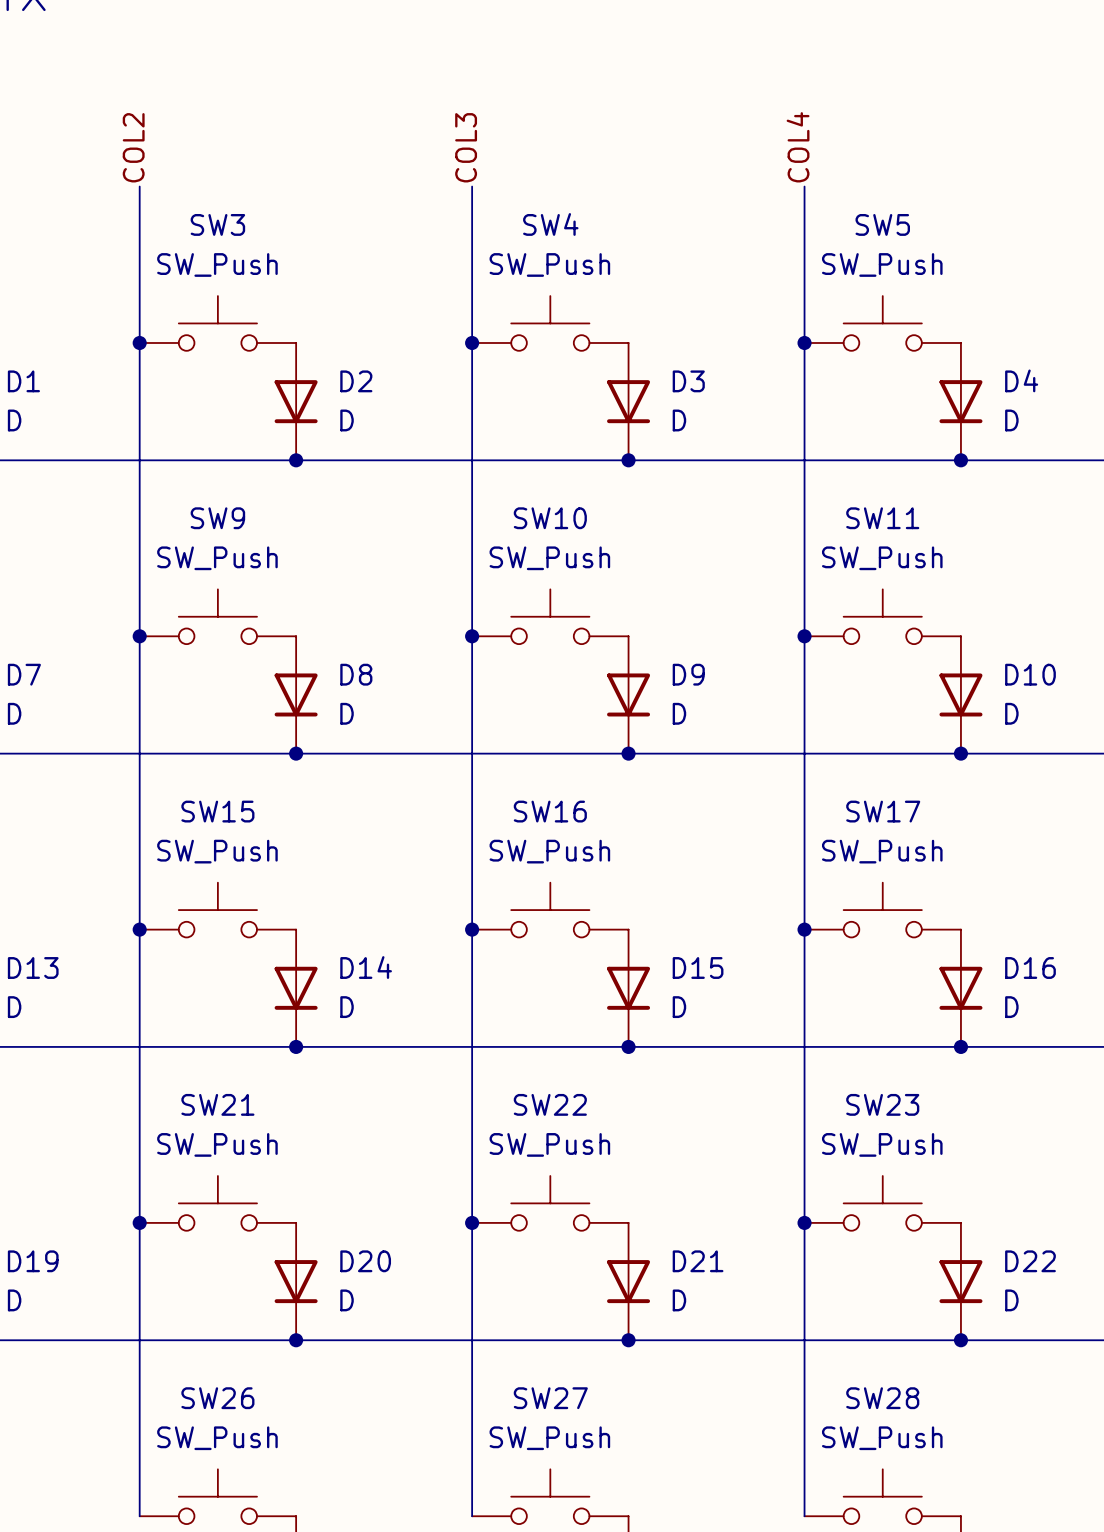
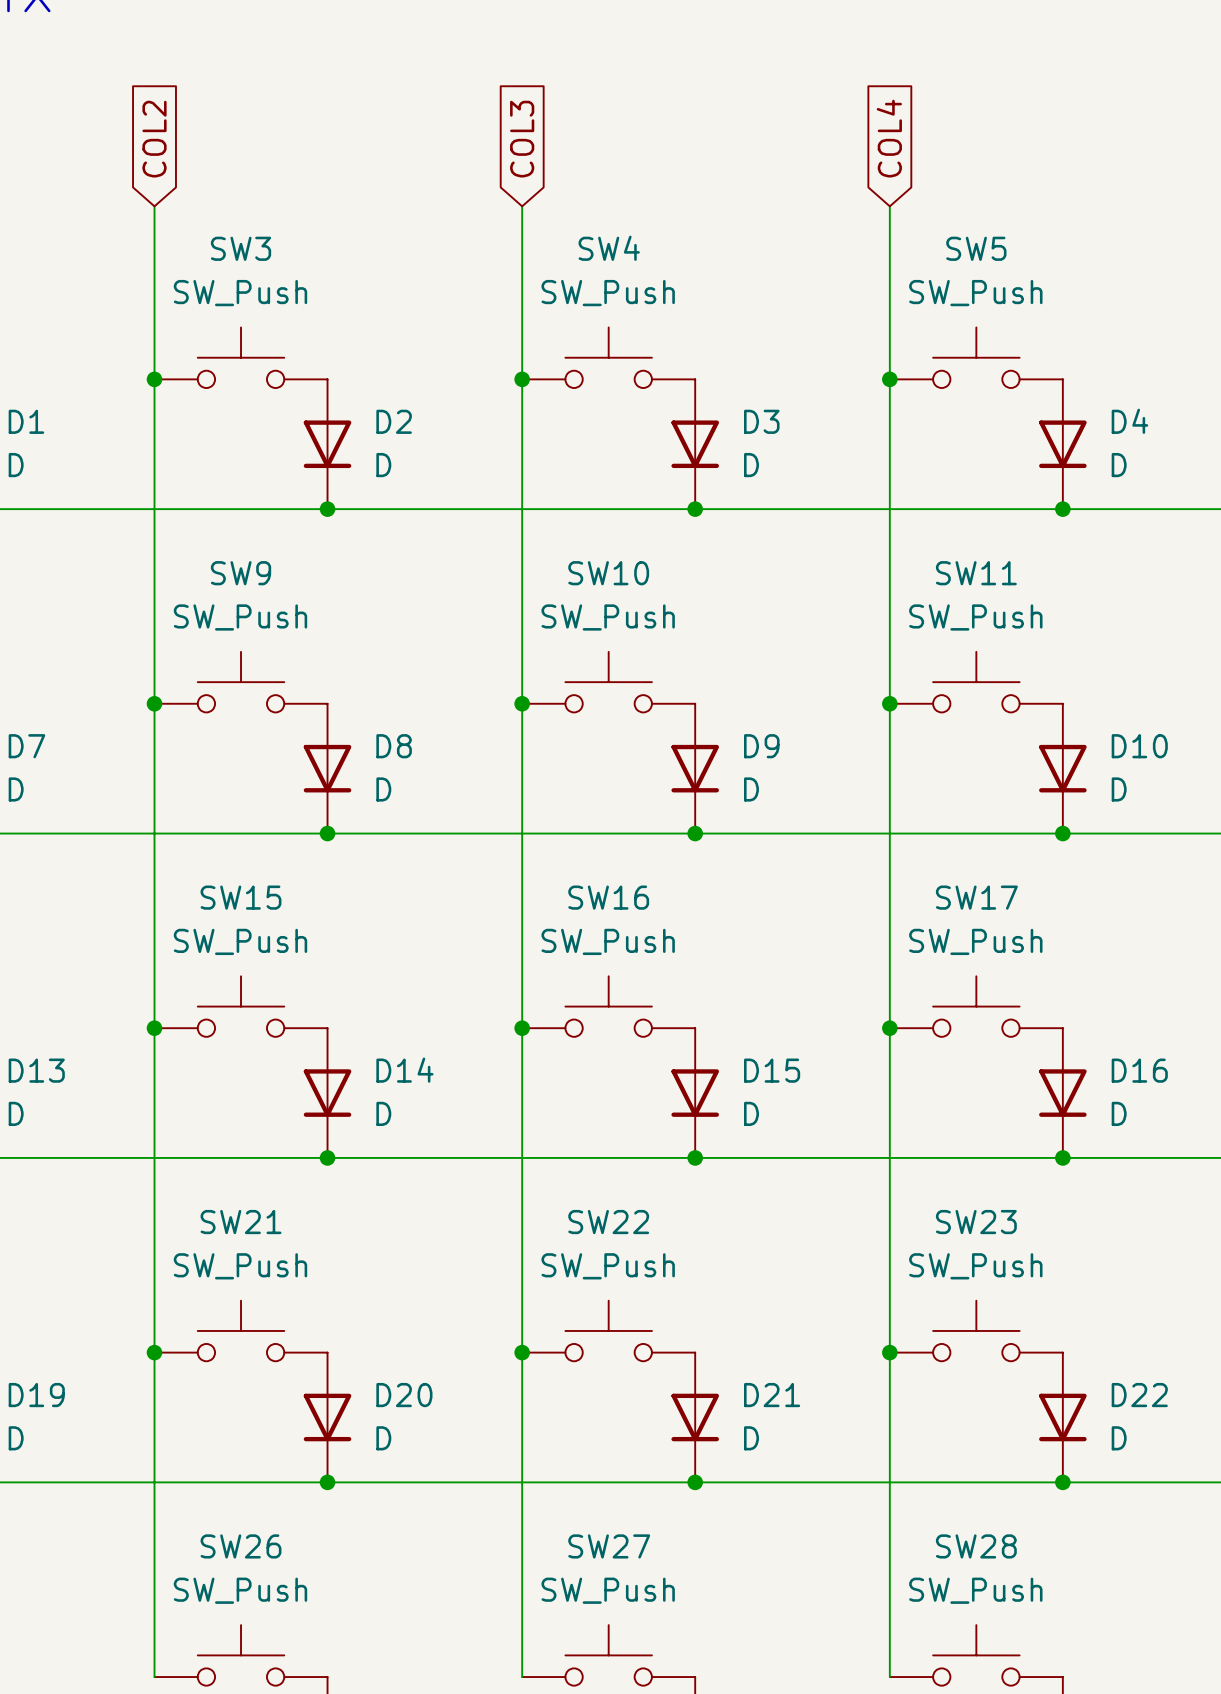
global label: none -> COL2 (154, 139)
global label: none -> COL3 (522, 139)
global label: none -> COL4 (889, 138)
label: COL2 (133, 147) -> none
label: COL3 (466, 147) -> none
label: COL4 (798, 147) -> none

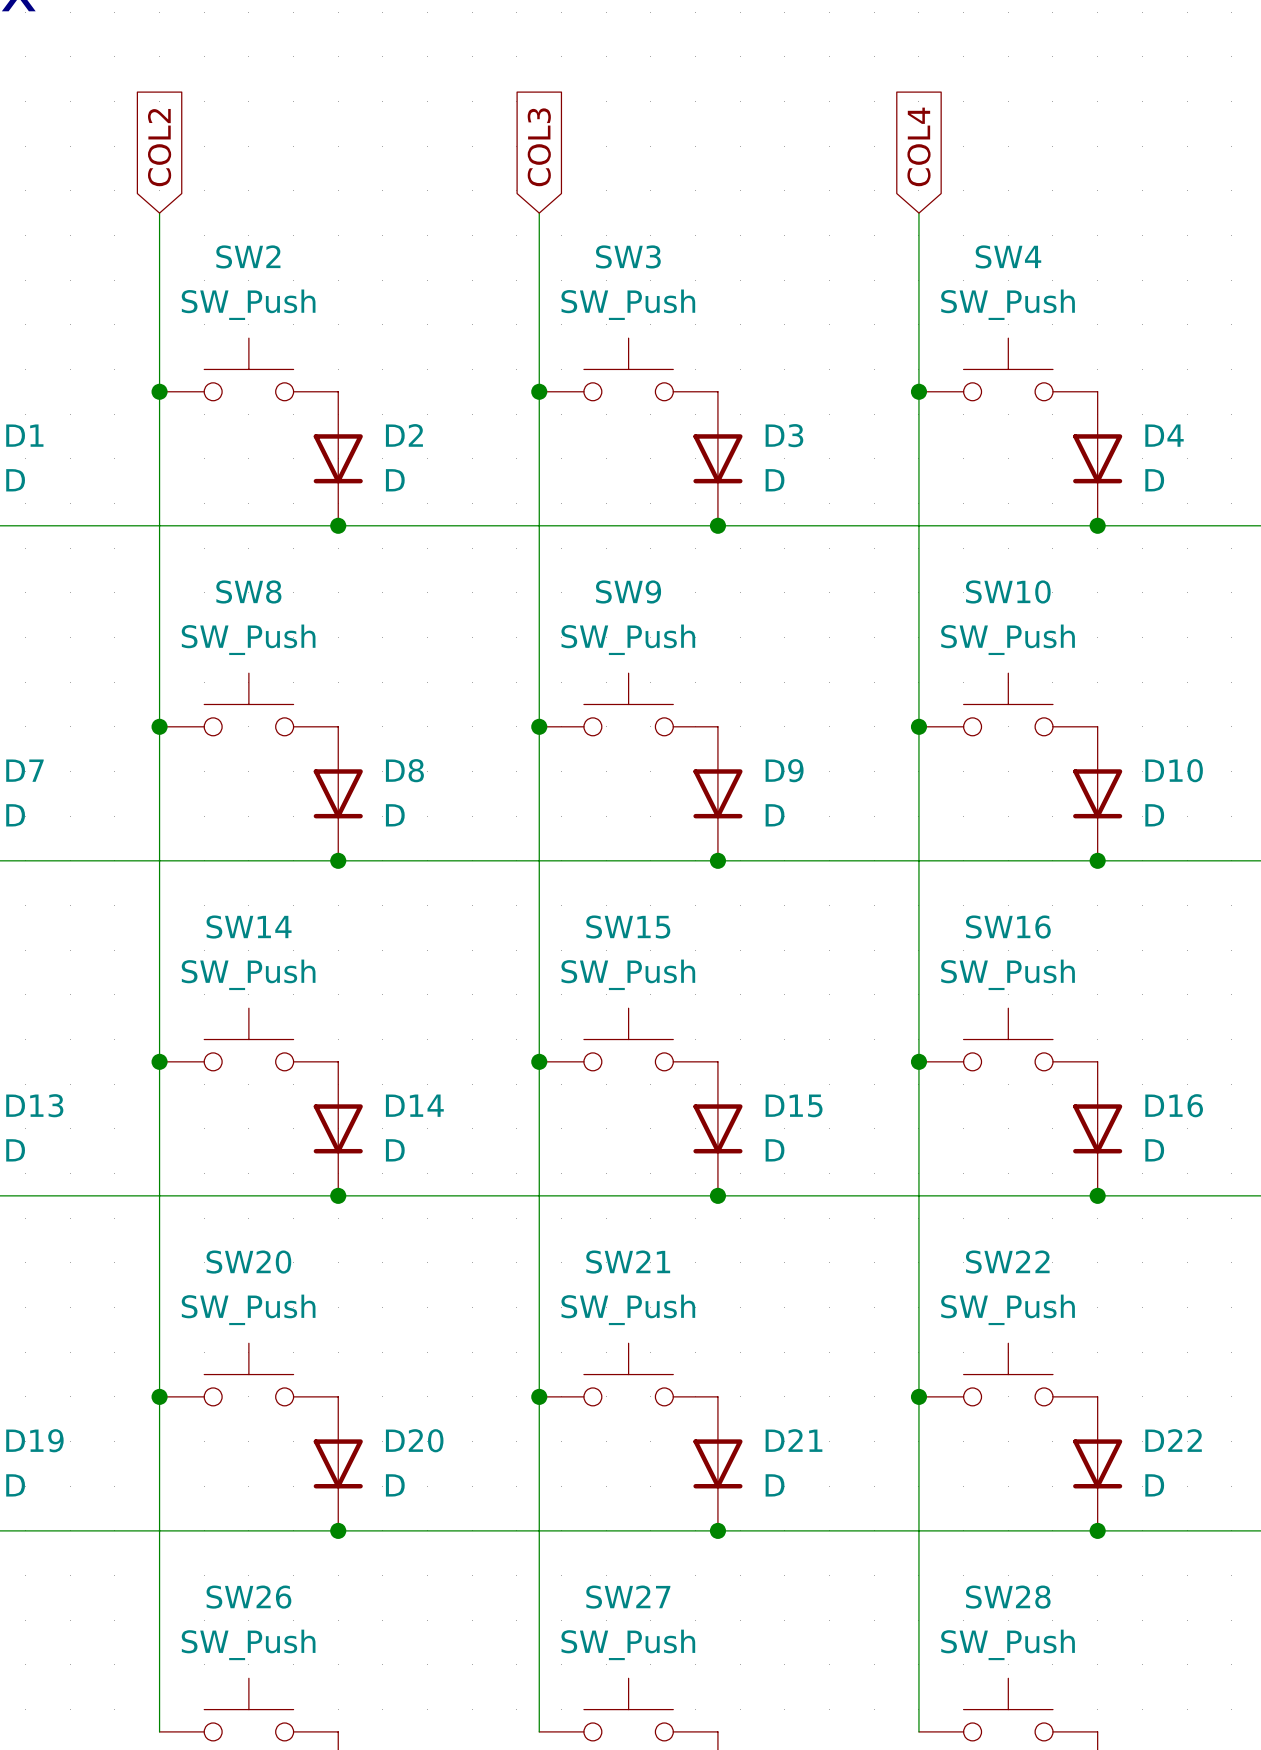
SW3 name: SW3 (241, 248) -> SW2 (248, 256)
SW4 name: SW4 (609, 248) -> SW3 (628, 256)
SW5 name: SW5 (976, 248) -> SW4 (1008, 256)
SW9 name: SW9 (241, 573) -> SW8 (248, 591)
SW10 name: SW10 (608, 573) -> SW9 (628, 591)
SW11 name: SW11 (976, 573) -> SW10 (1008, 591)
SW15 name: SW15 (241, 897) -> SW14 (249, 927)
SW16 name: SW16 (608, 897) -> SW15 (628, 927)
SW17 name: SW17 (976, 897) -> SW16 (1008, 927)
SW21 name: SW21 (241, 1222) -> SW20 (248, 1262)
SW22 name: SW22 (608, 1222) -> SW21 (628, 1262)
SW23 name: SW23 (976, 1222) -> SW22 (1007, 1262)

